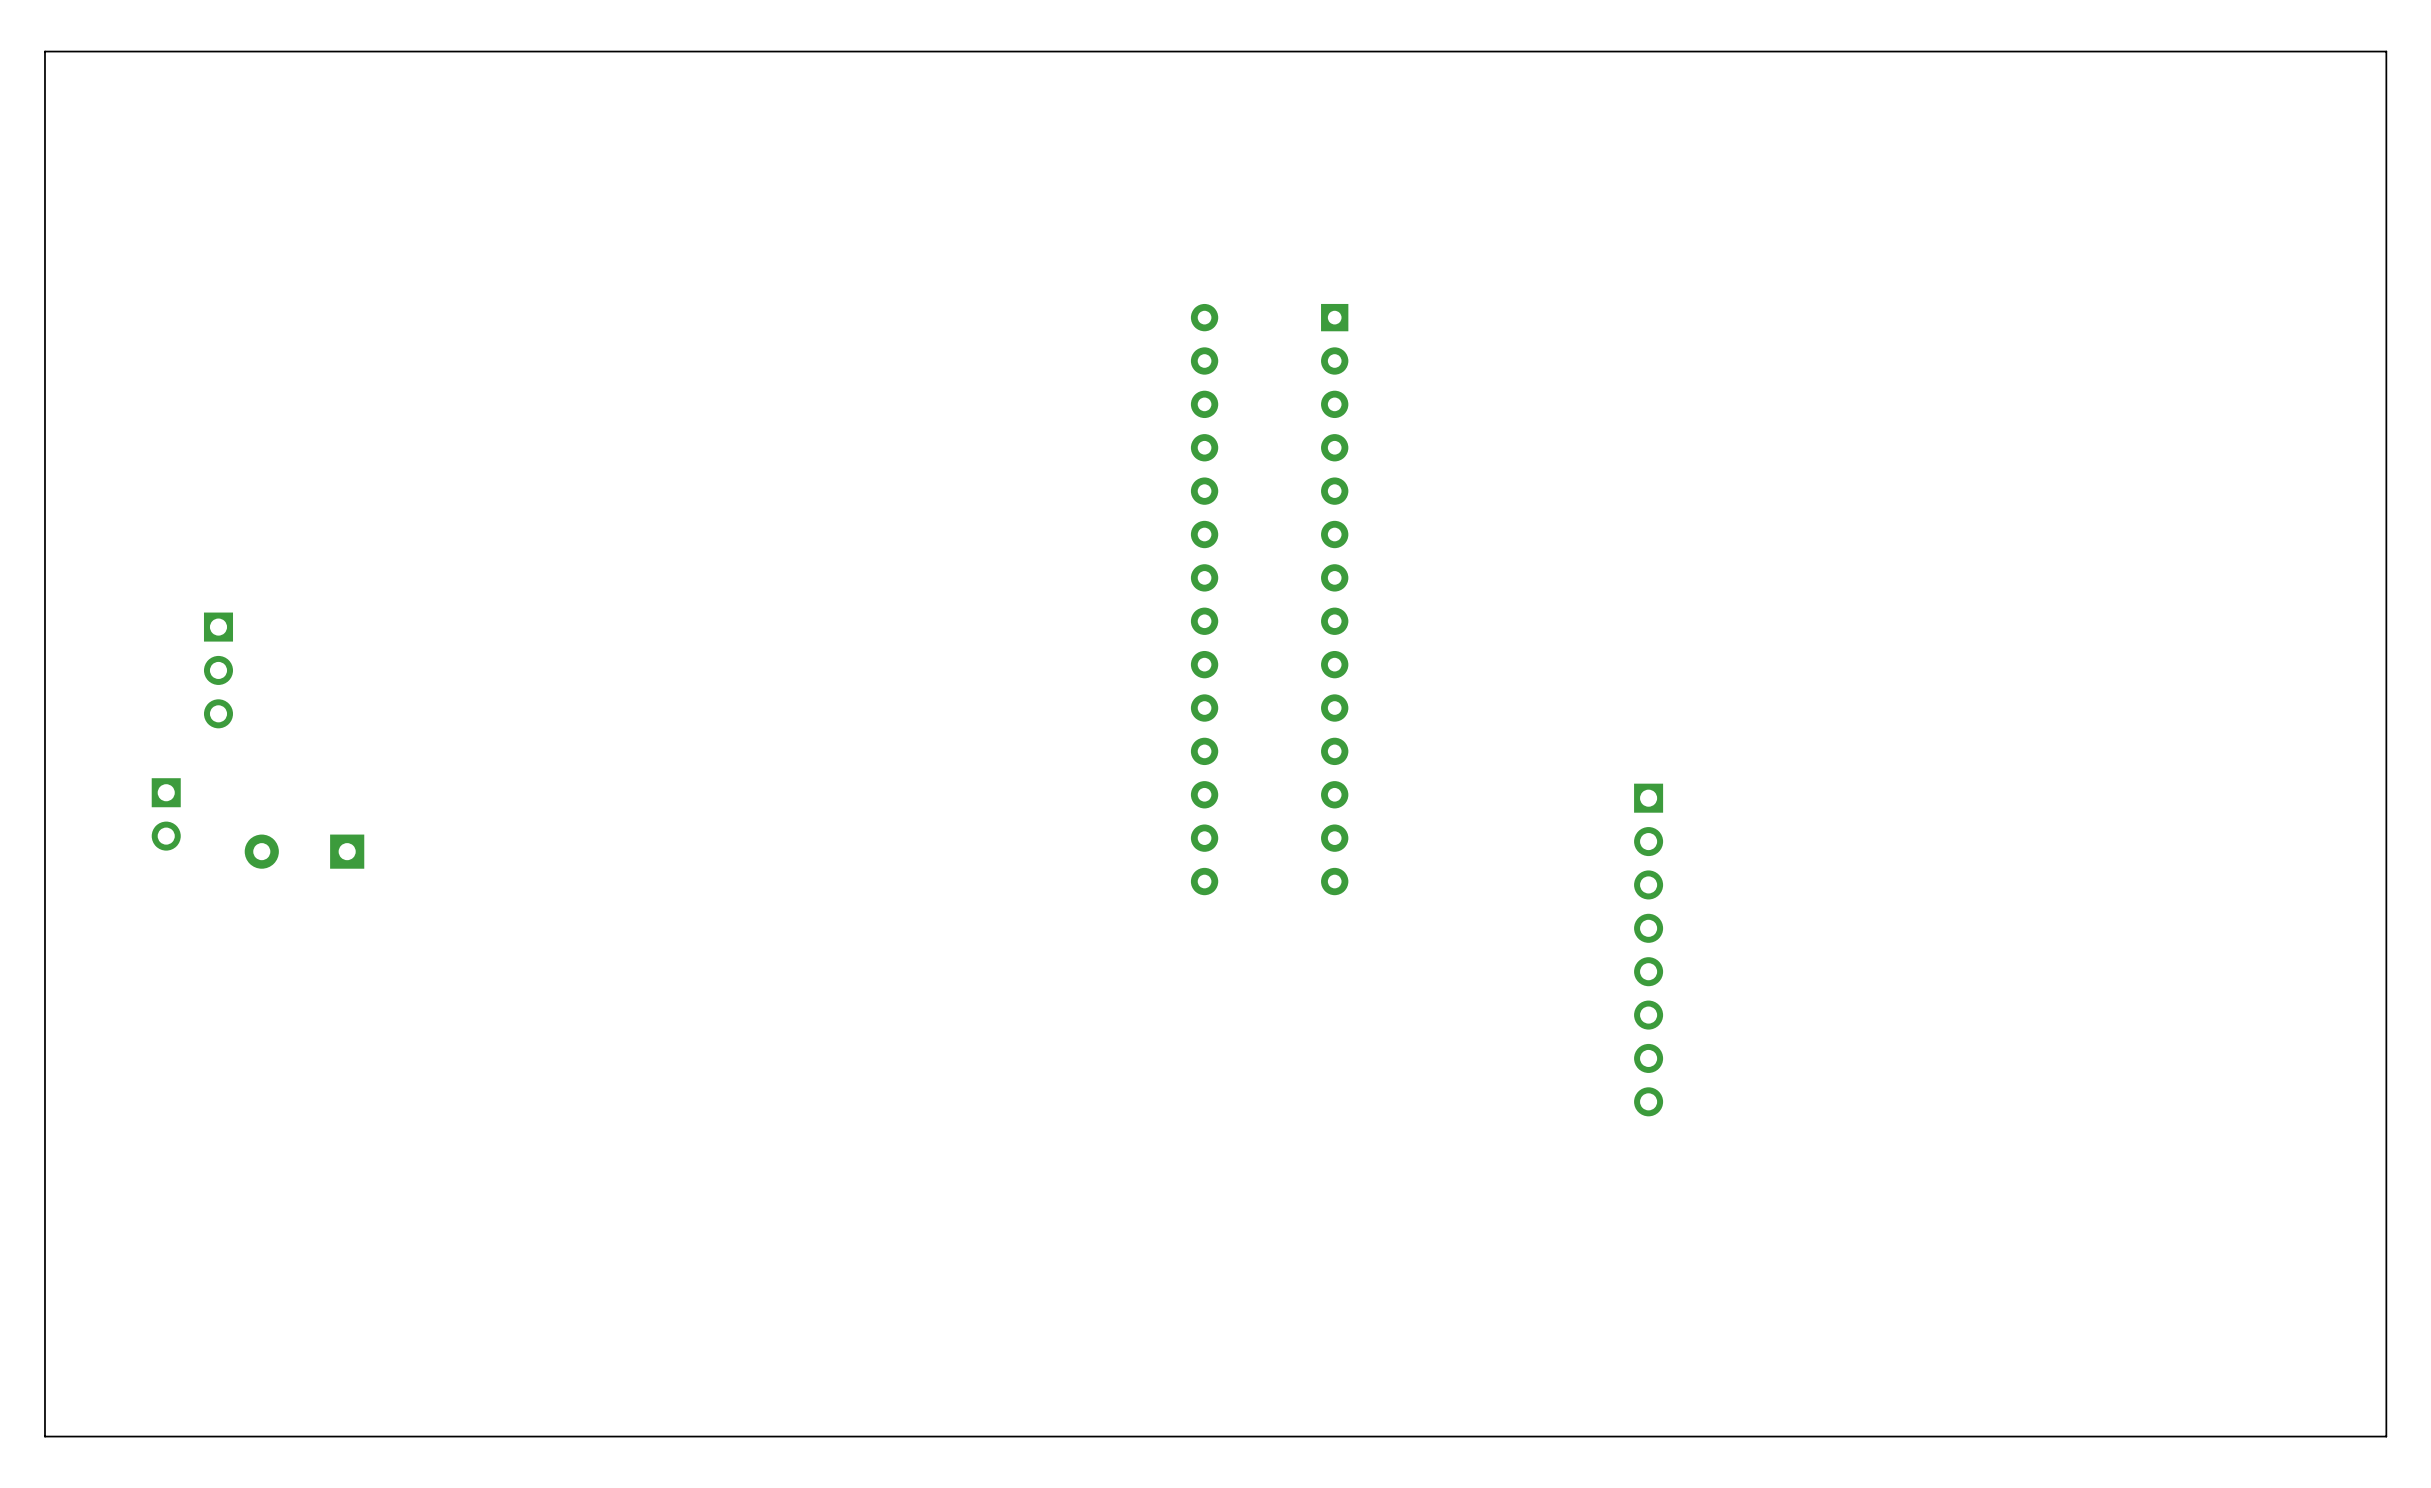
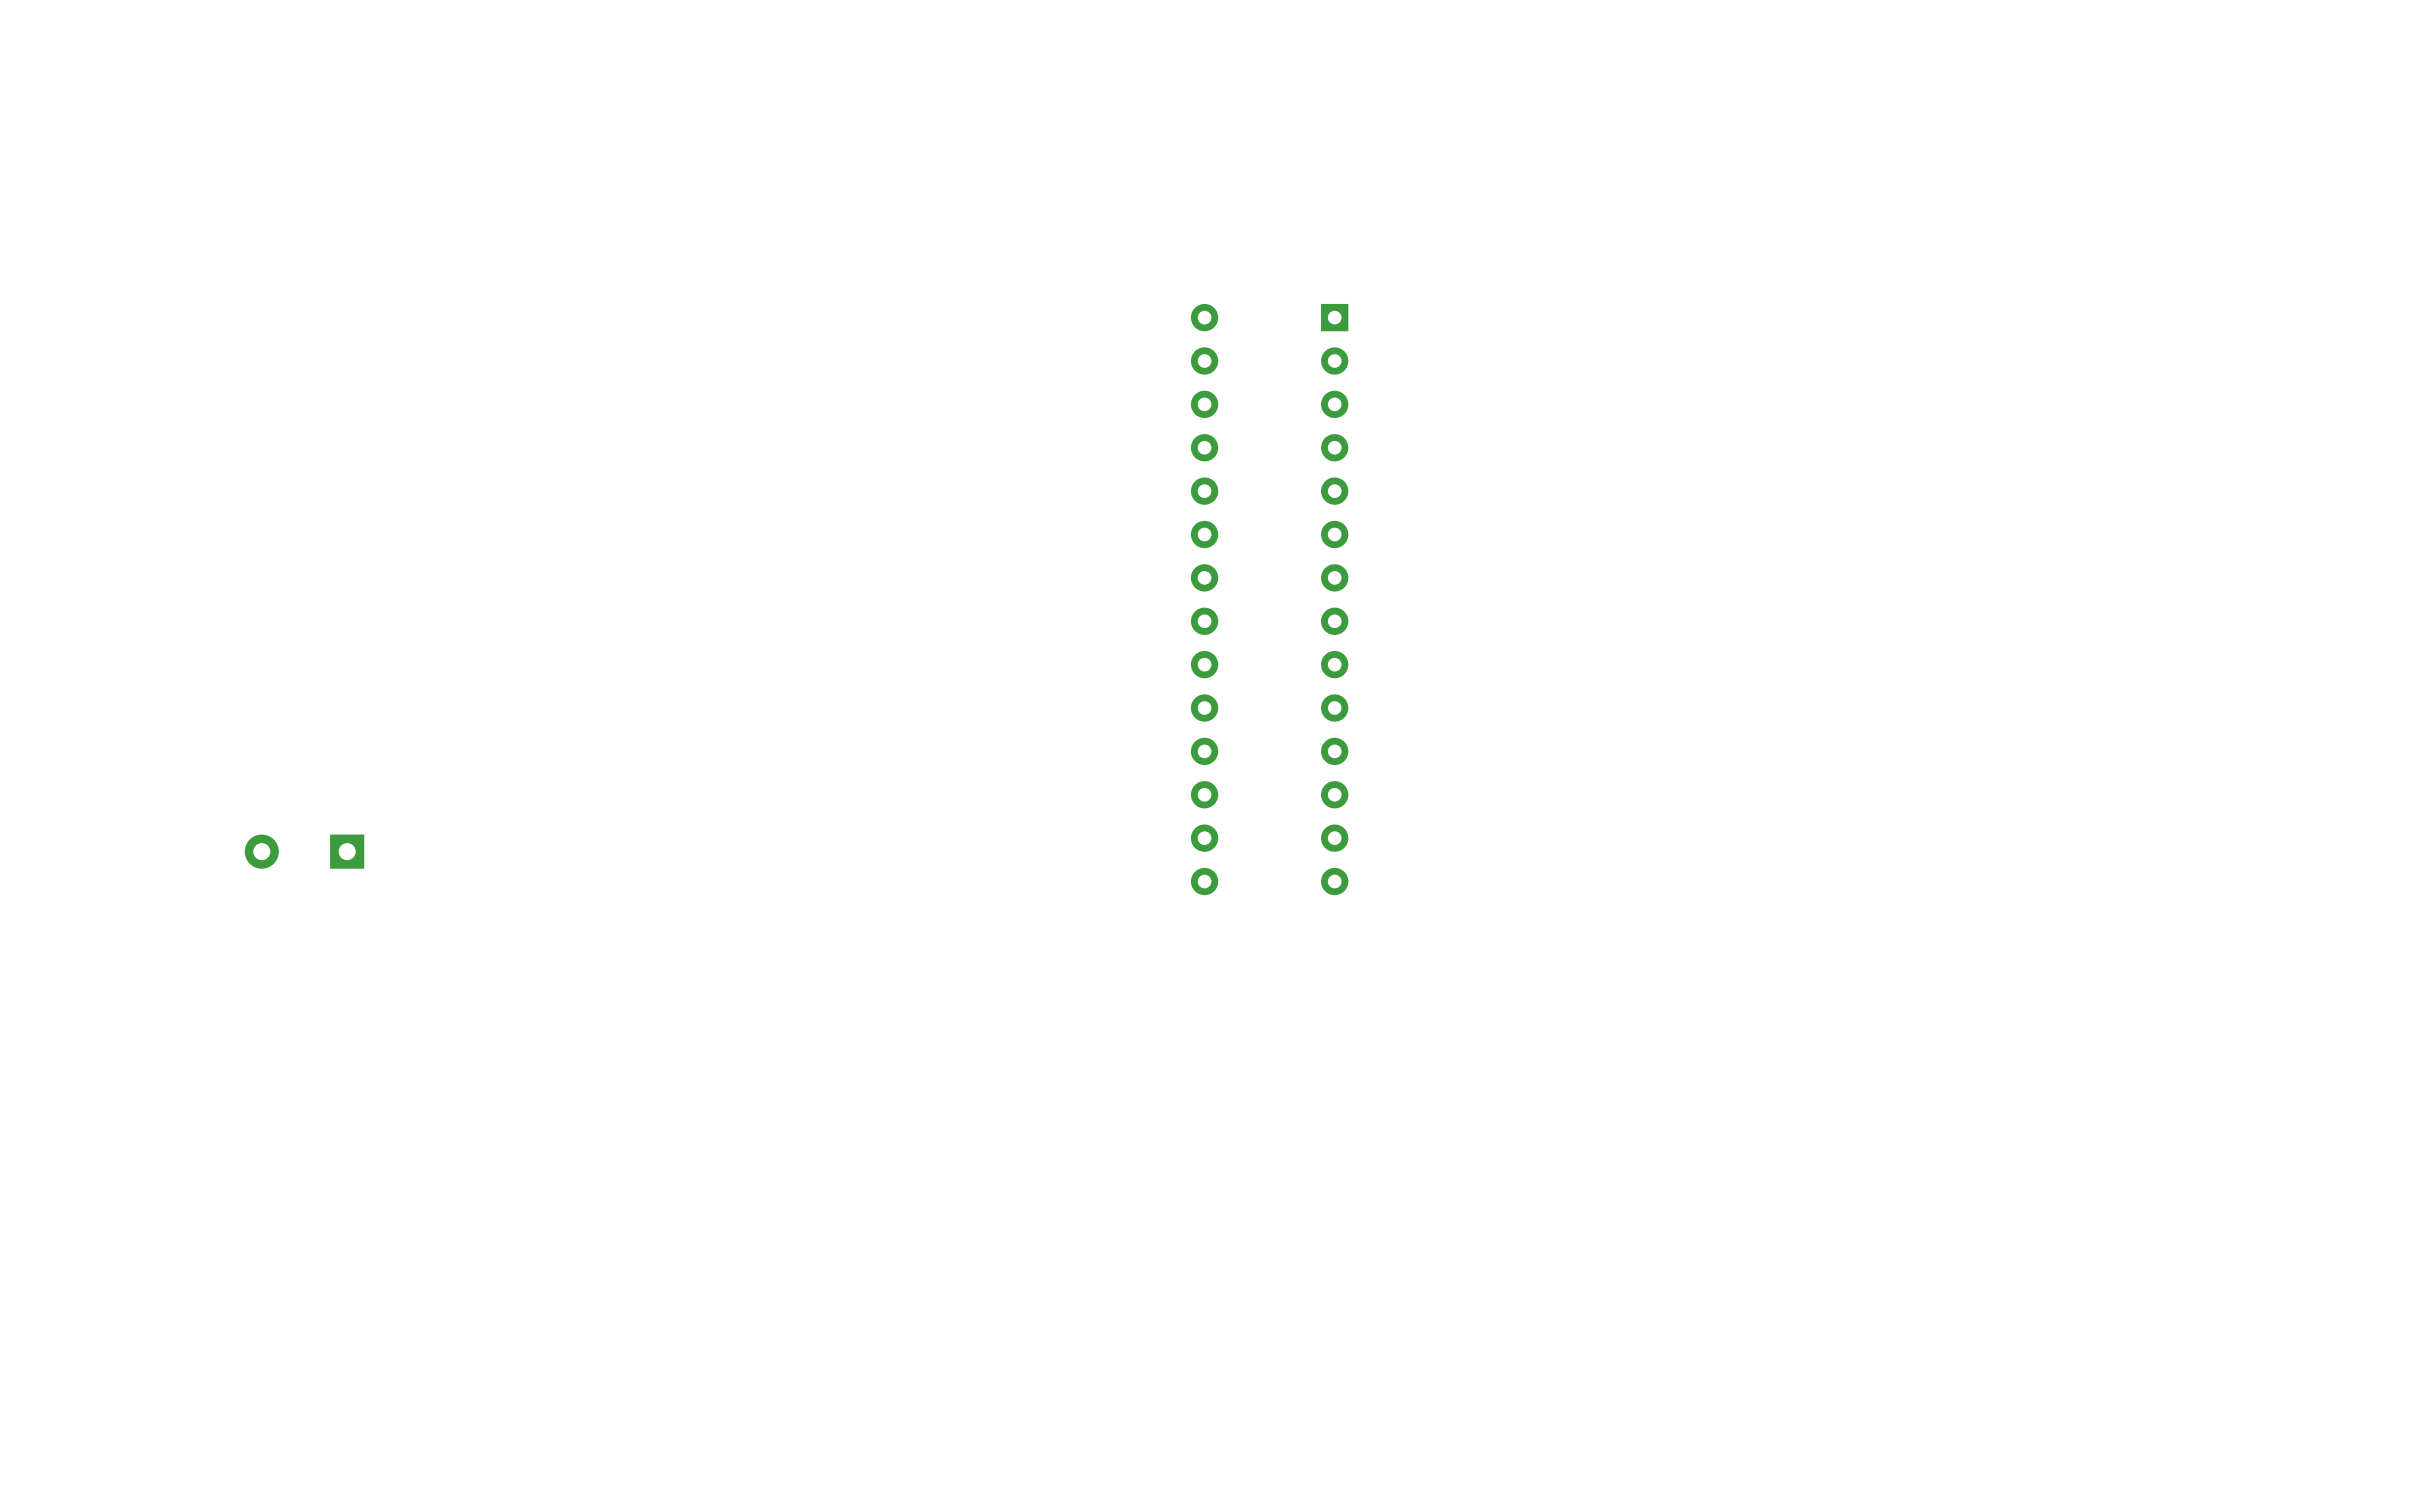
board edge: (2386, 51) (44, 51) (44, 1436) (2386, 1436) (2386, 51) -> none
part: (218, 670) -> none
part: (166, 814) -> none
part: (1648, 950) -> none

